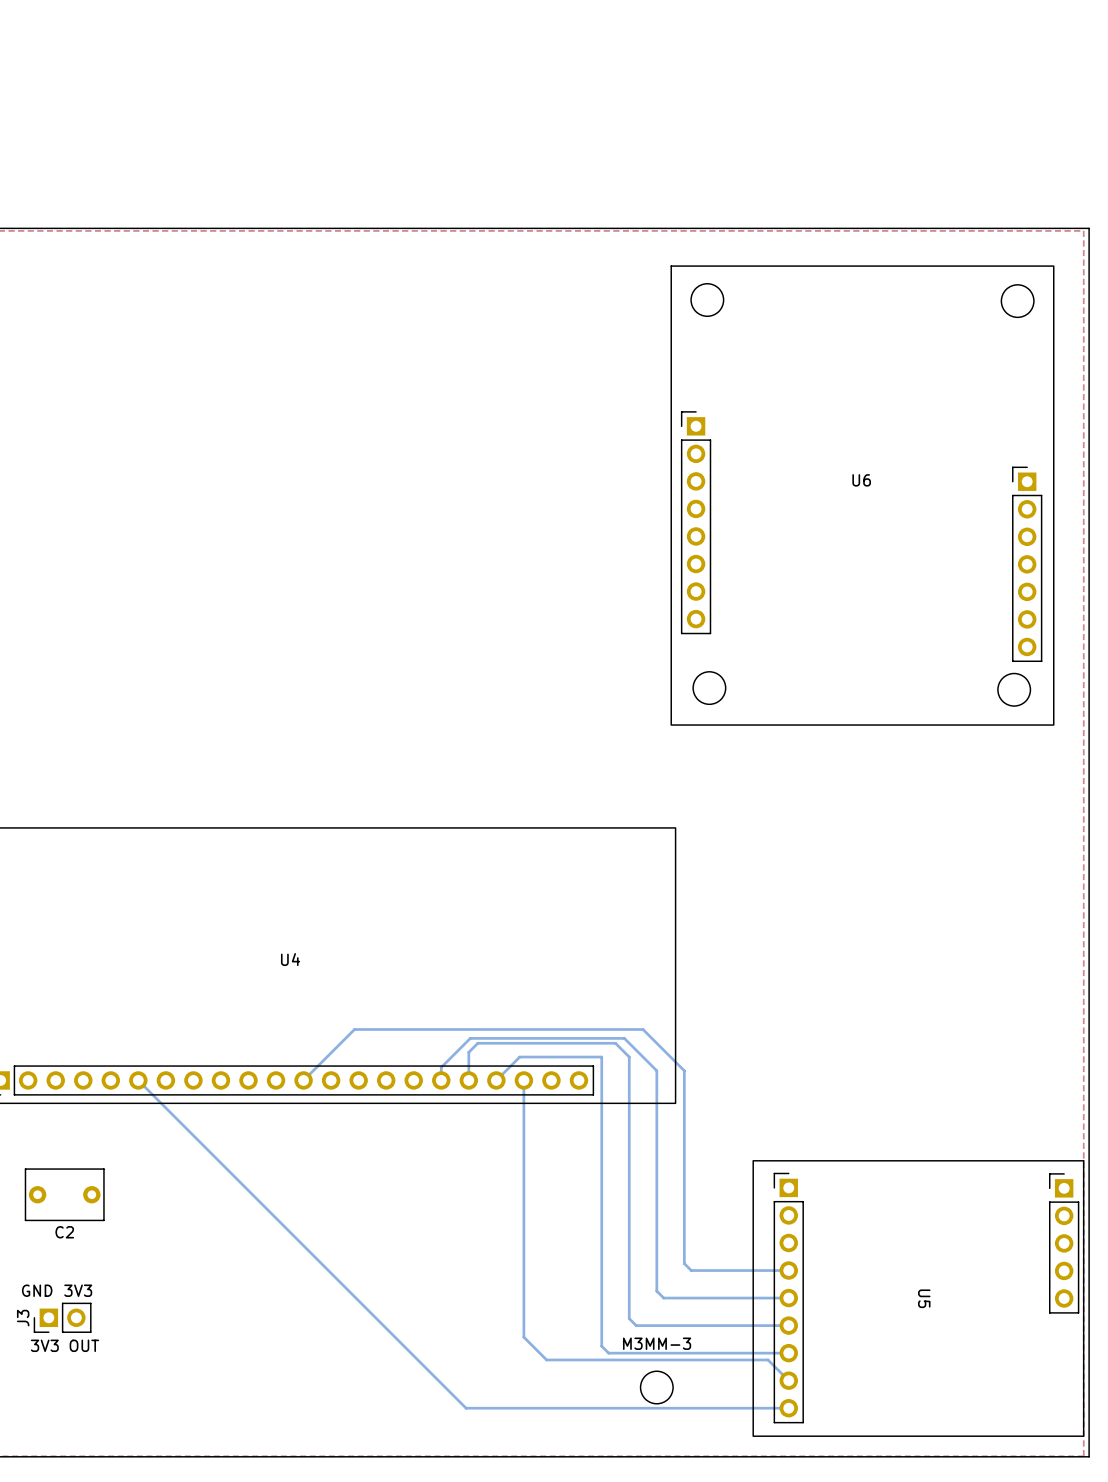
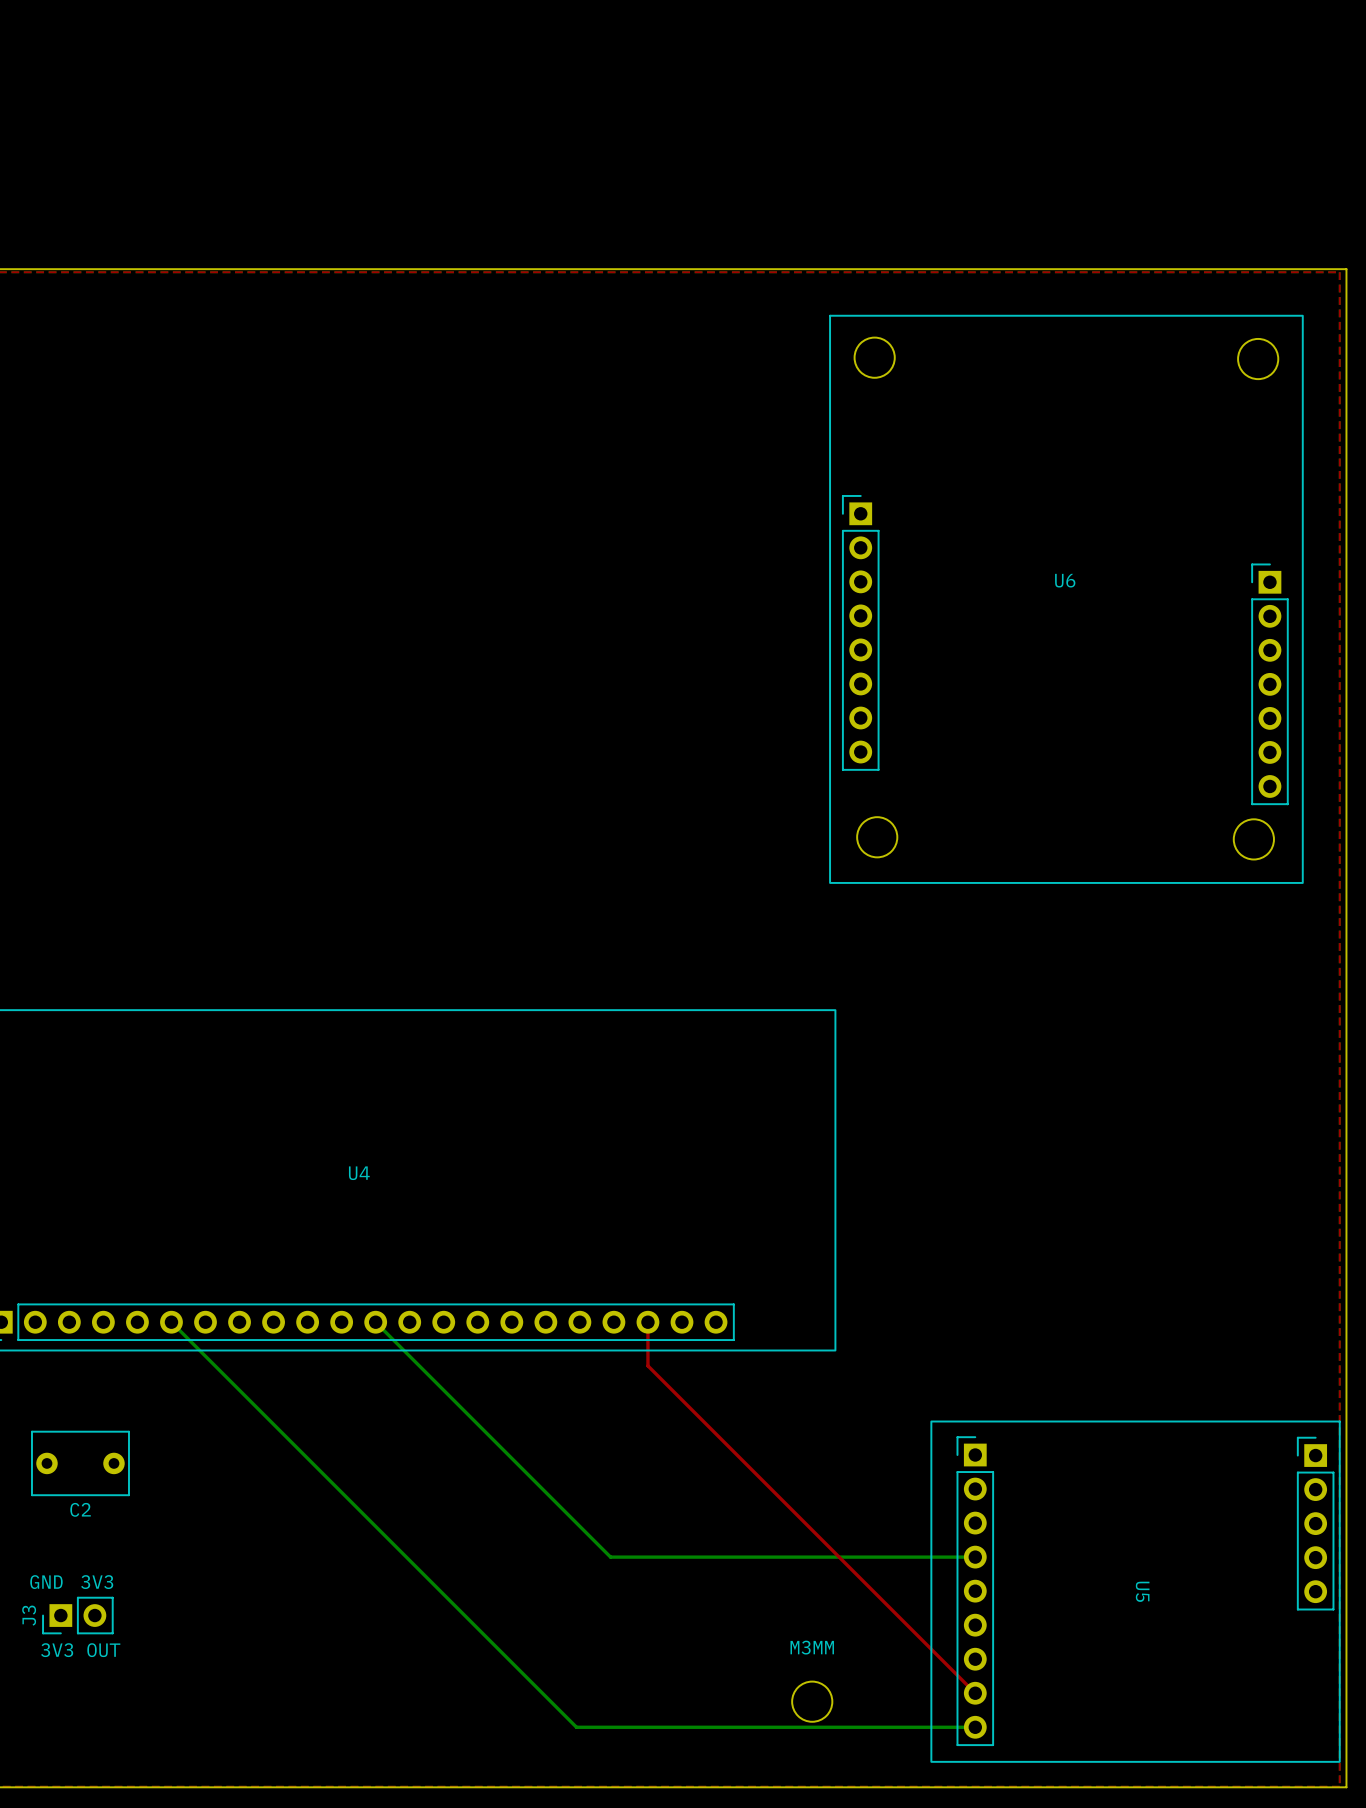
bottom track: (303, 1080) (354, 1029) (643, 1029) (684, 1070) (684, 1263) (691, 1270) -> (375, 1322) (610, 1557) (854, 1557)
bottom track: (441, 1080) (441, 1067) (470, 1038) (624, 1038) (656, 1070) (656, 1291) (663, 1298) (788, 1298) -> none
bottom track: (468, 1080) (468, 1052) (477, 1043) (615, 1043) (629, 1057) (629, 1318) (636, 1325) (788, 1325) -> none
bottom track: (496, 1080) (519, 1057) (601, 1057) (601, 1346) (608, 1353) (788, 1353) -> none
bottom track: (523, 1080) (523, 1337) (546, 1359) (768, 1359) (788, 1380) -> none
top track: none -> (647, 1322) (647, 1365) (975, 1693)
M3MM-3 name: M3MM-3 (657, 1343) -> M3MM (812, 1647)

